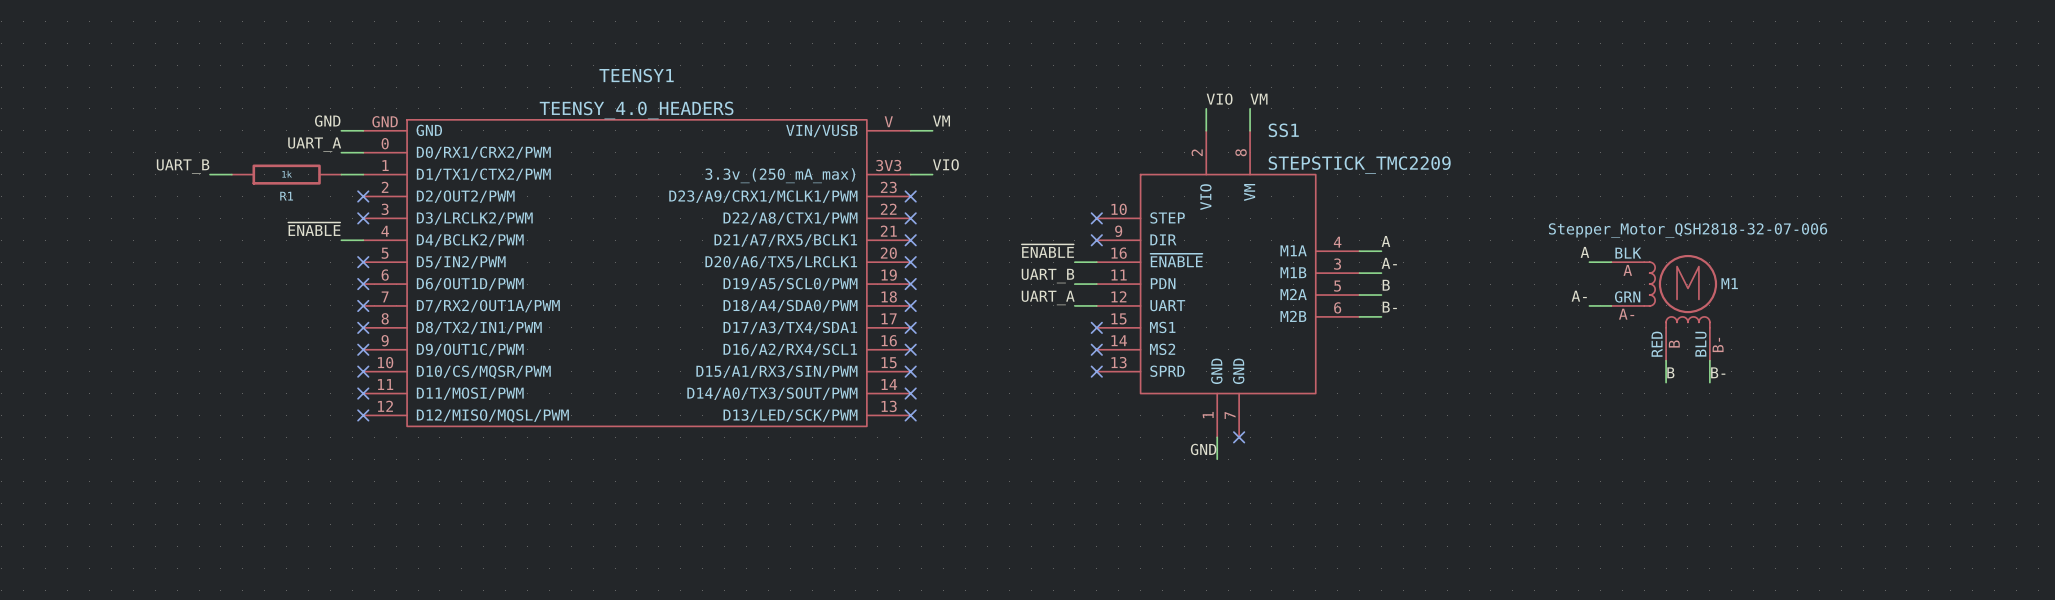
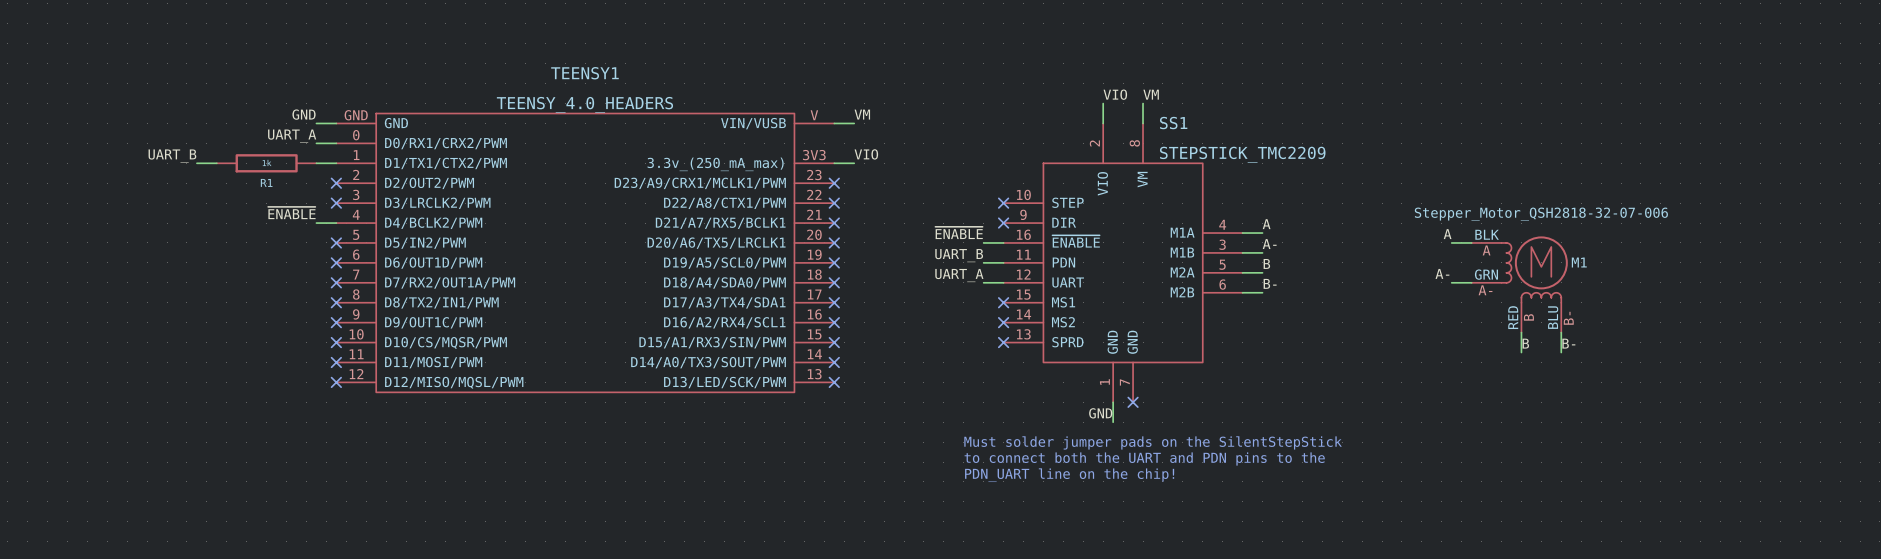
text: none -> Must solder jumper pads on the SilentStepStick (1153, 442)
text: none -> to connect both the UART and PDN pins to the (1144, 459)
text: none -> PDN_UART line on the chip! (1069, 475)

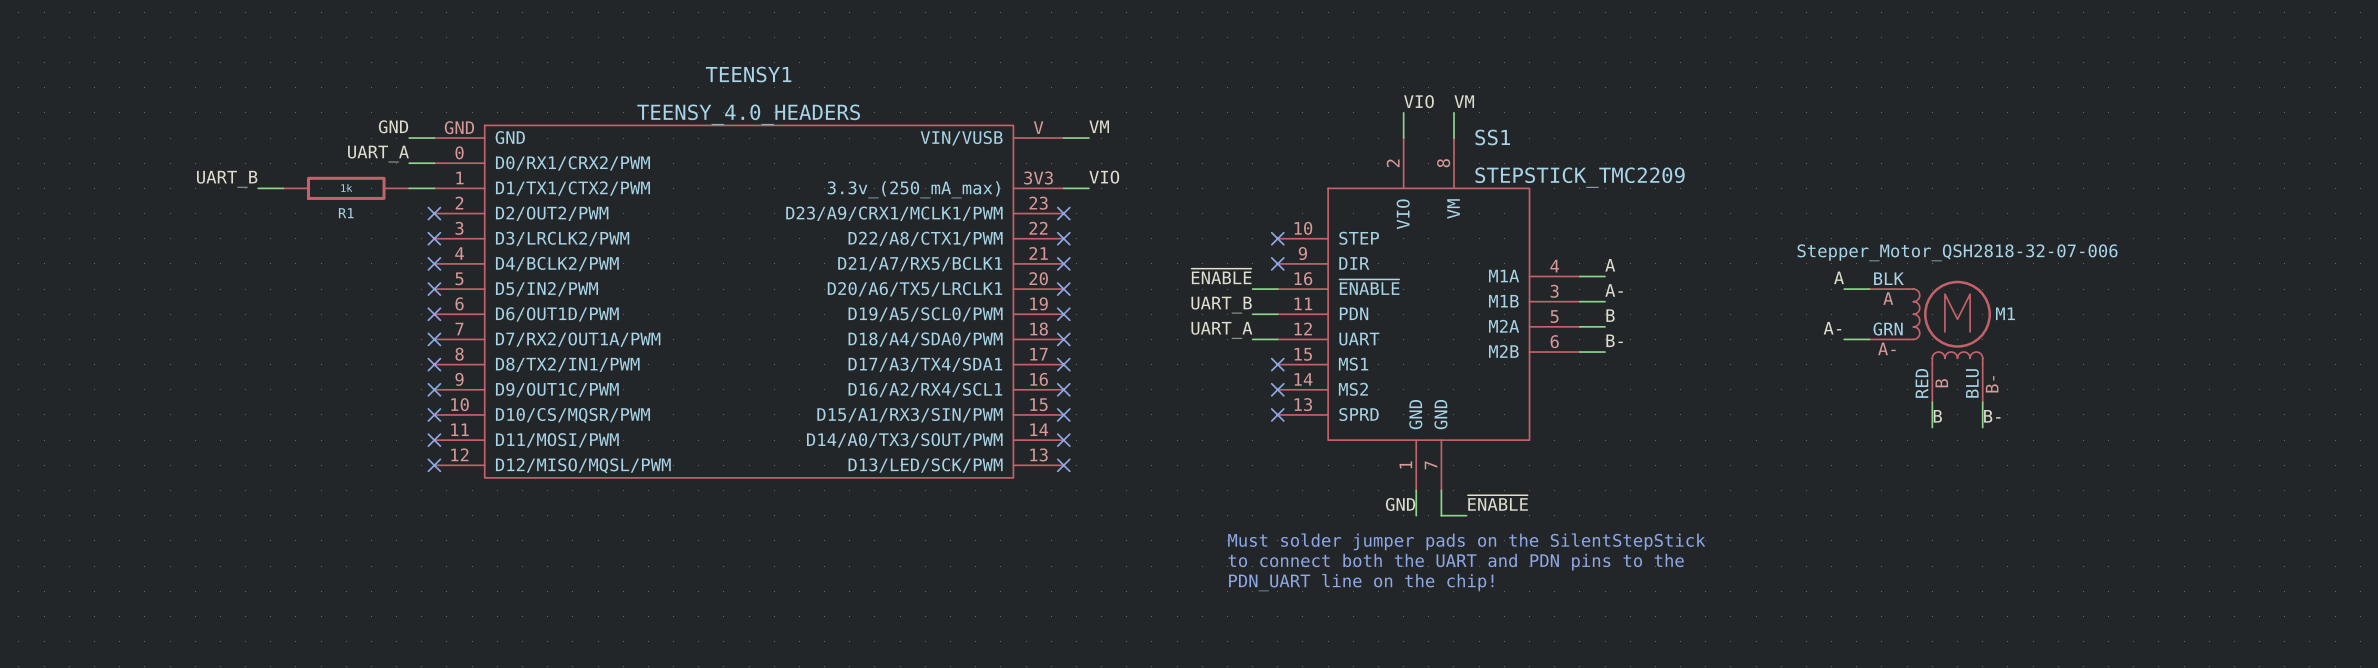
label: ~{ENABLE} (291, 213) -> none
wire: (316, 223) (336, 223) -> none
no-connect mark: none -> (434, 263)
wire: none -> (1441, 490) (1441, 515) (1466, 515)
no-connect mark: (1133, 402) -> none
label: none -> ~{ENABLE} (1497, 502)

